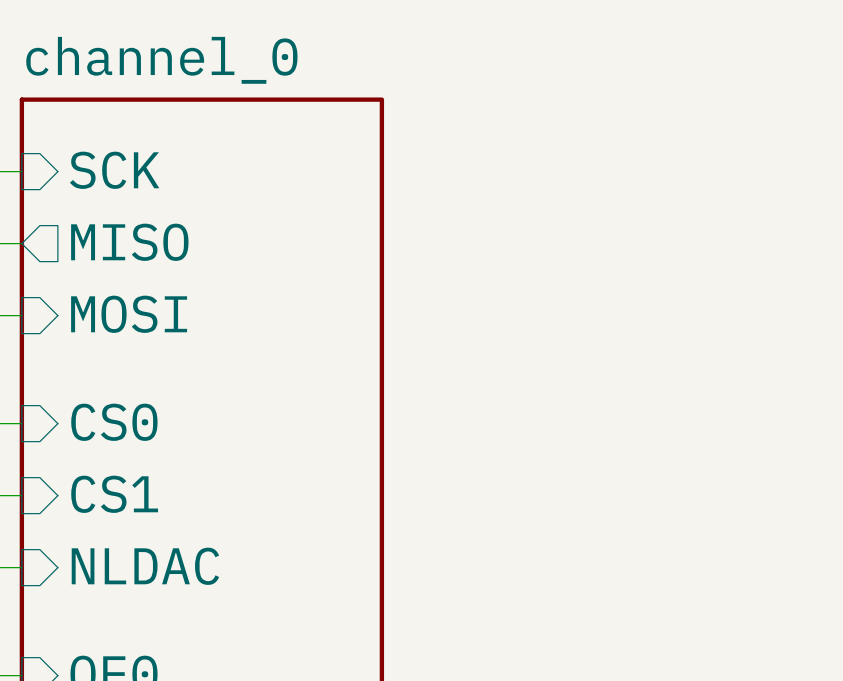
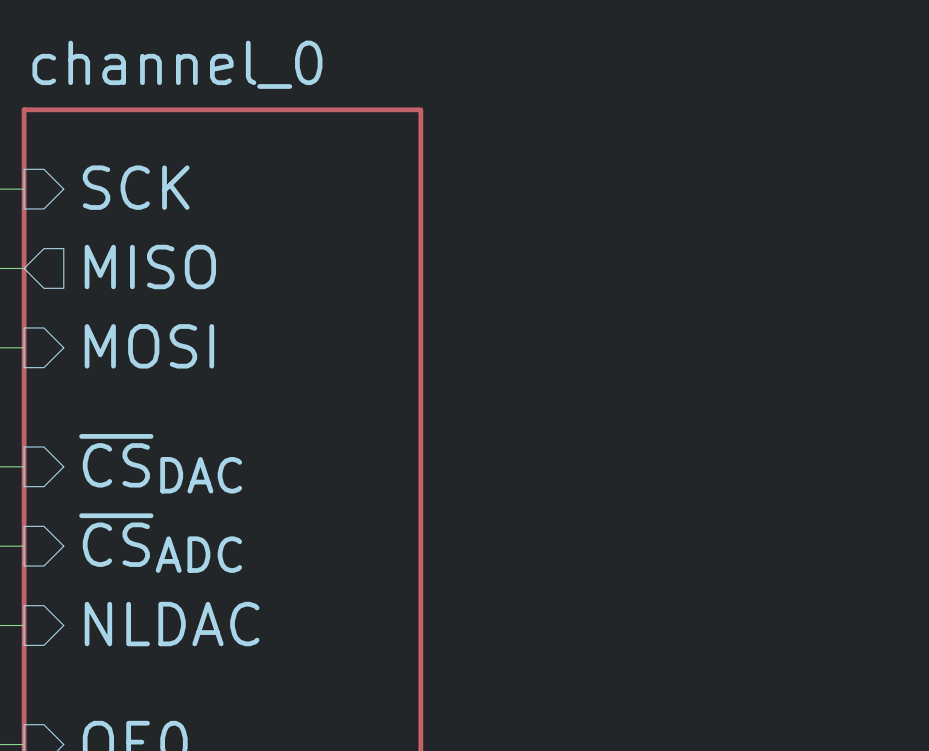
sheet pin: CS0 (114, 422) -> ~{CS}DAC (160, 463)
sheet pin: CS1 (114, 494) -> ~{CS}ADC (160, 543)

